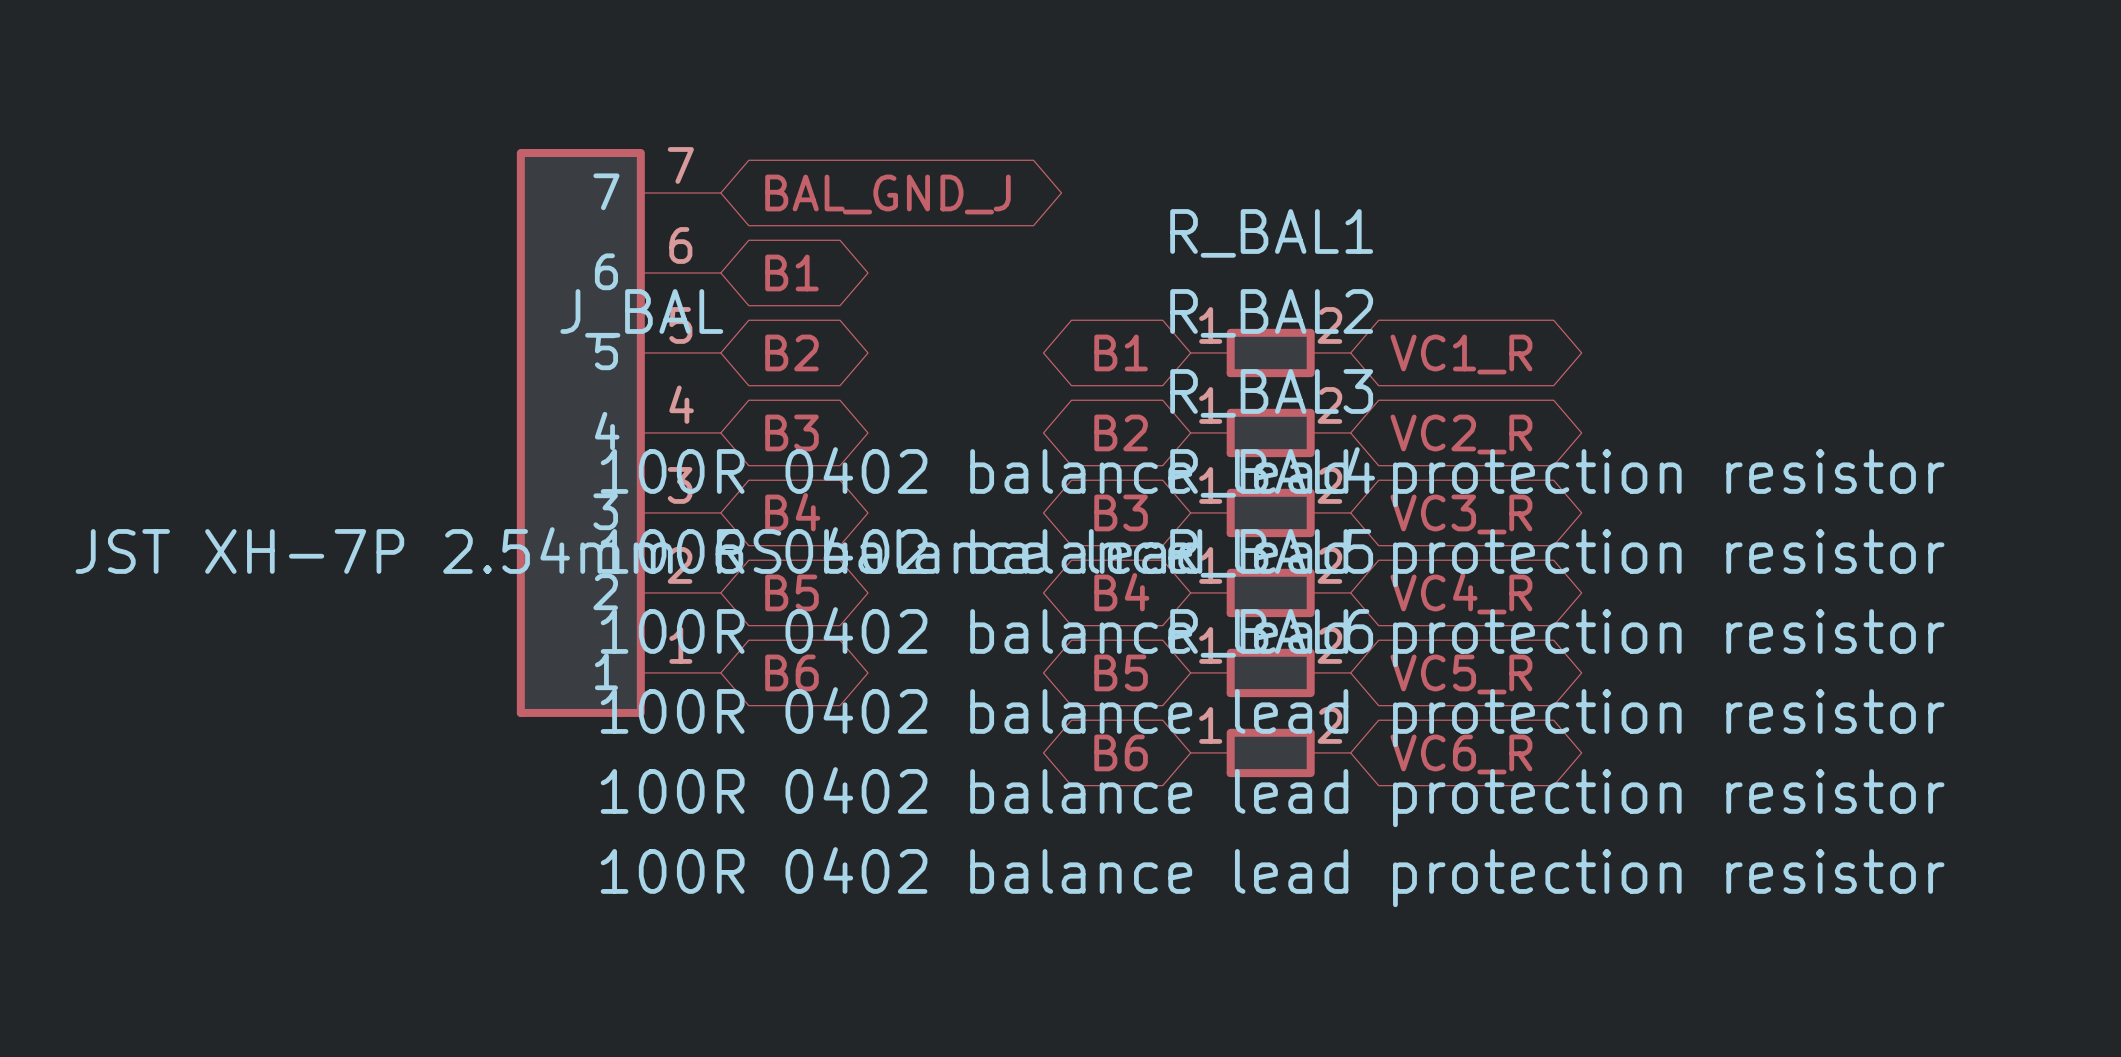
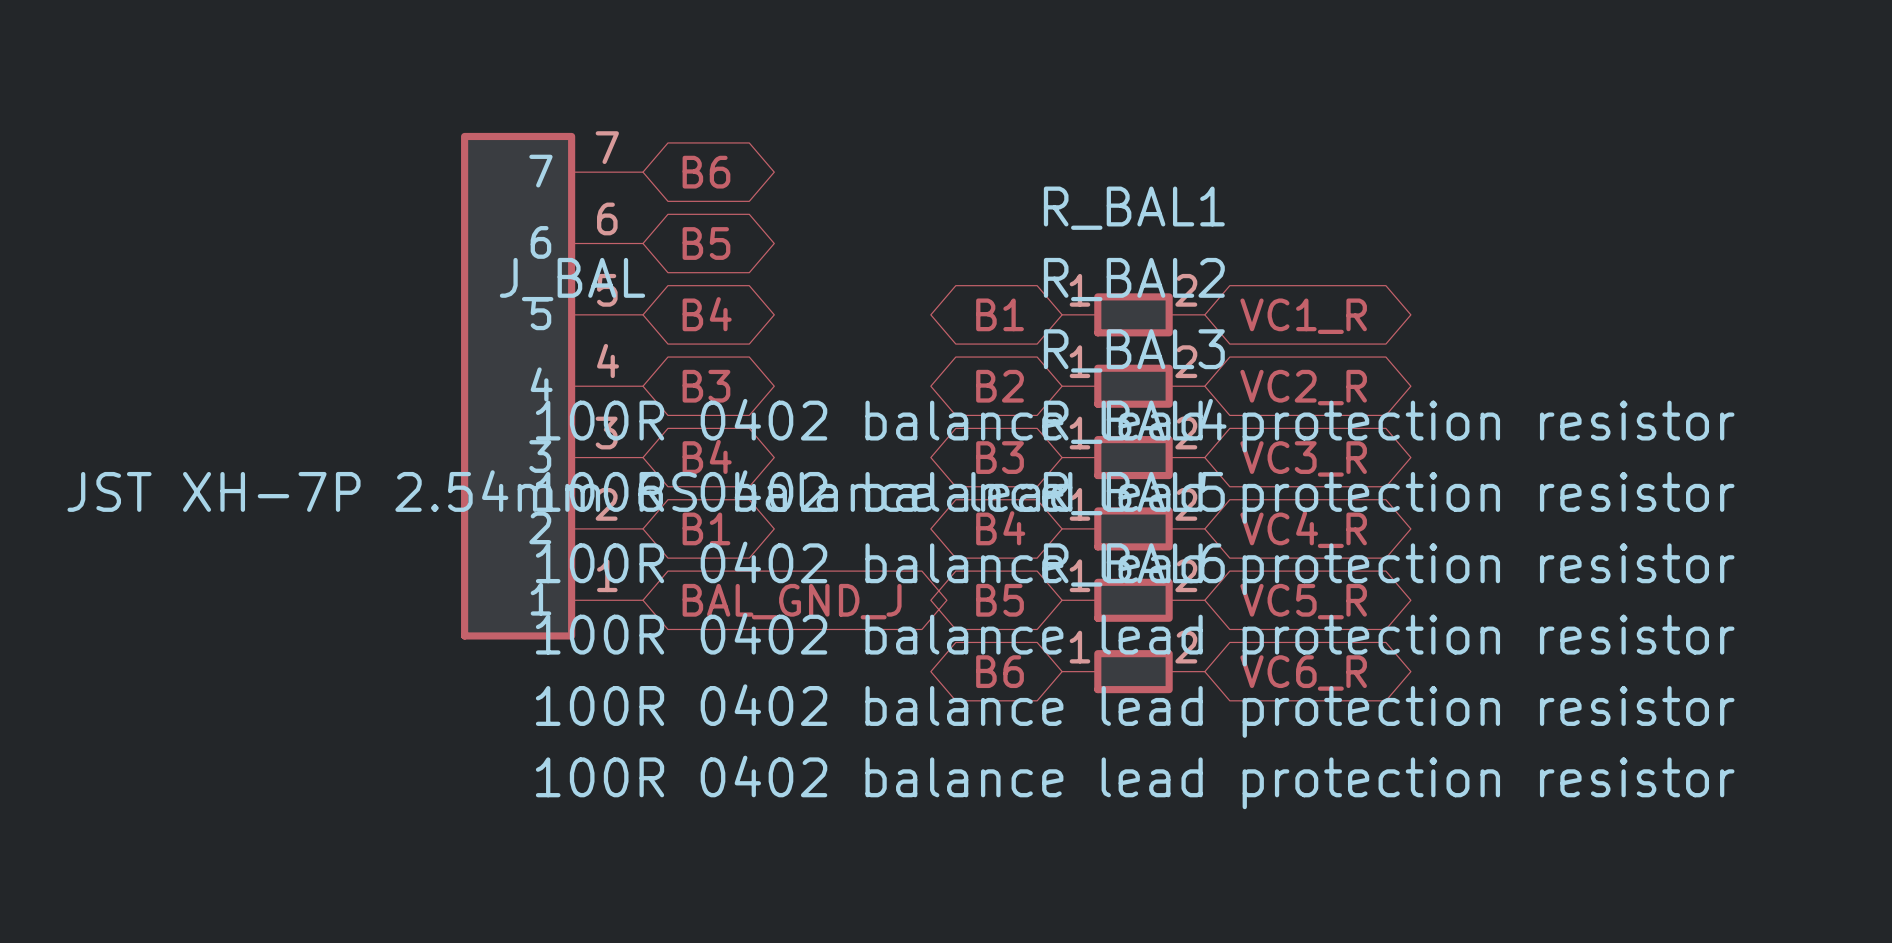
global label: BAL_GND_J (887, 194) -> B6 (706, 172)
global label: B1 (791, 272) -> B5 (706, 243)
global label: B2 (791, 352) -> B4 (707, 314)
global label: B5 (791, 592) -> B1 (706, 528)
global label: B6 (791, 672) -> BAL_GND_J (792, 601)

